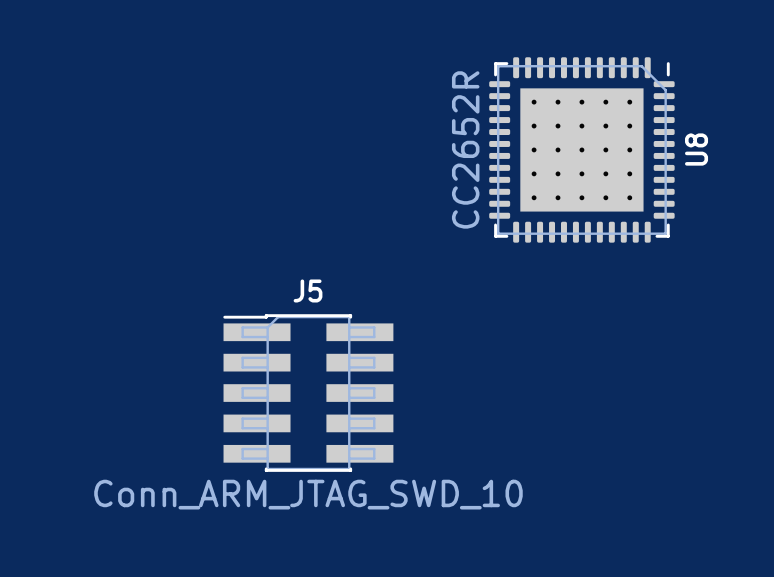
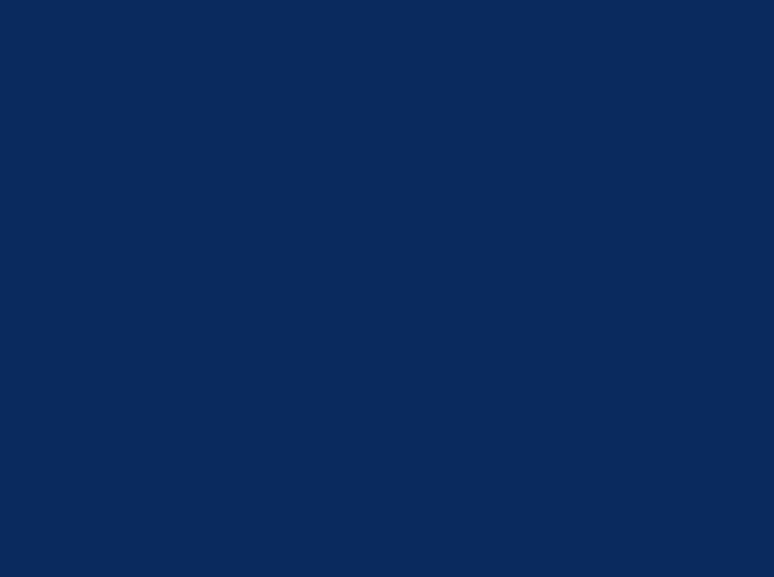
U8: CC2652R (581, 149) -> none
J5: Conn_ARM_JTAG_SWD_10 (308, 393) -> none

